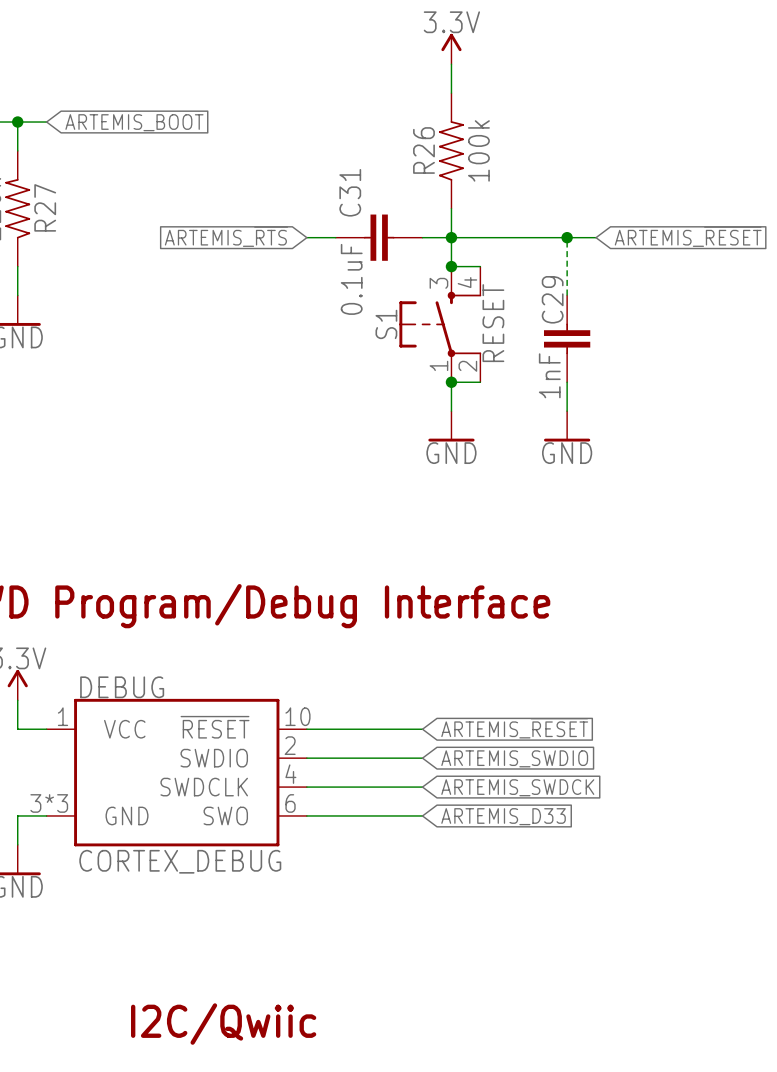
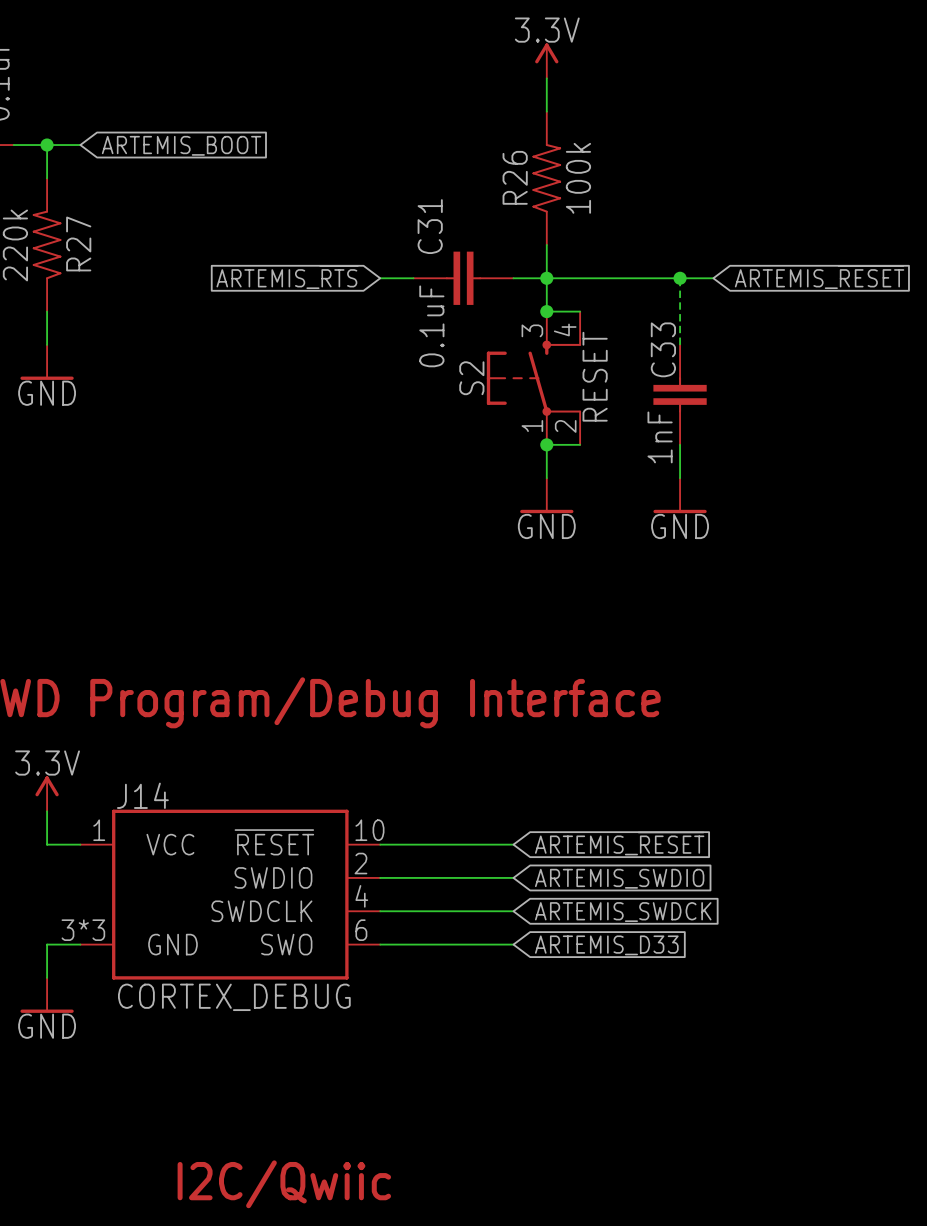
C29 name: C29 (552, 299) -> C33 (663, 349)
S1 name: S1 (386, 324) -> S2 (471, 378)
DEBUG name: DEBUG (122, 687) -> J14 (142, 795)

